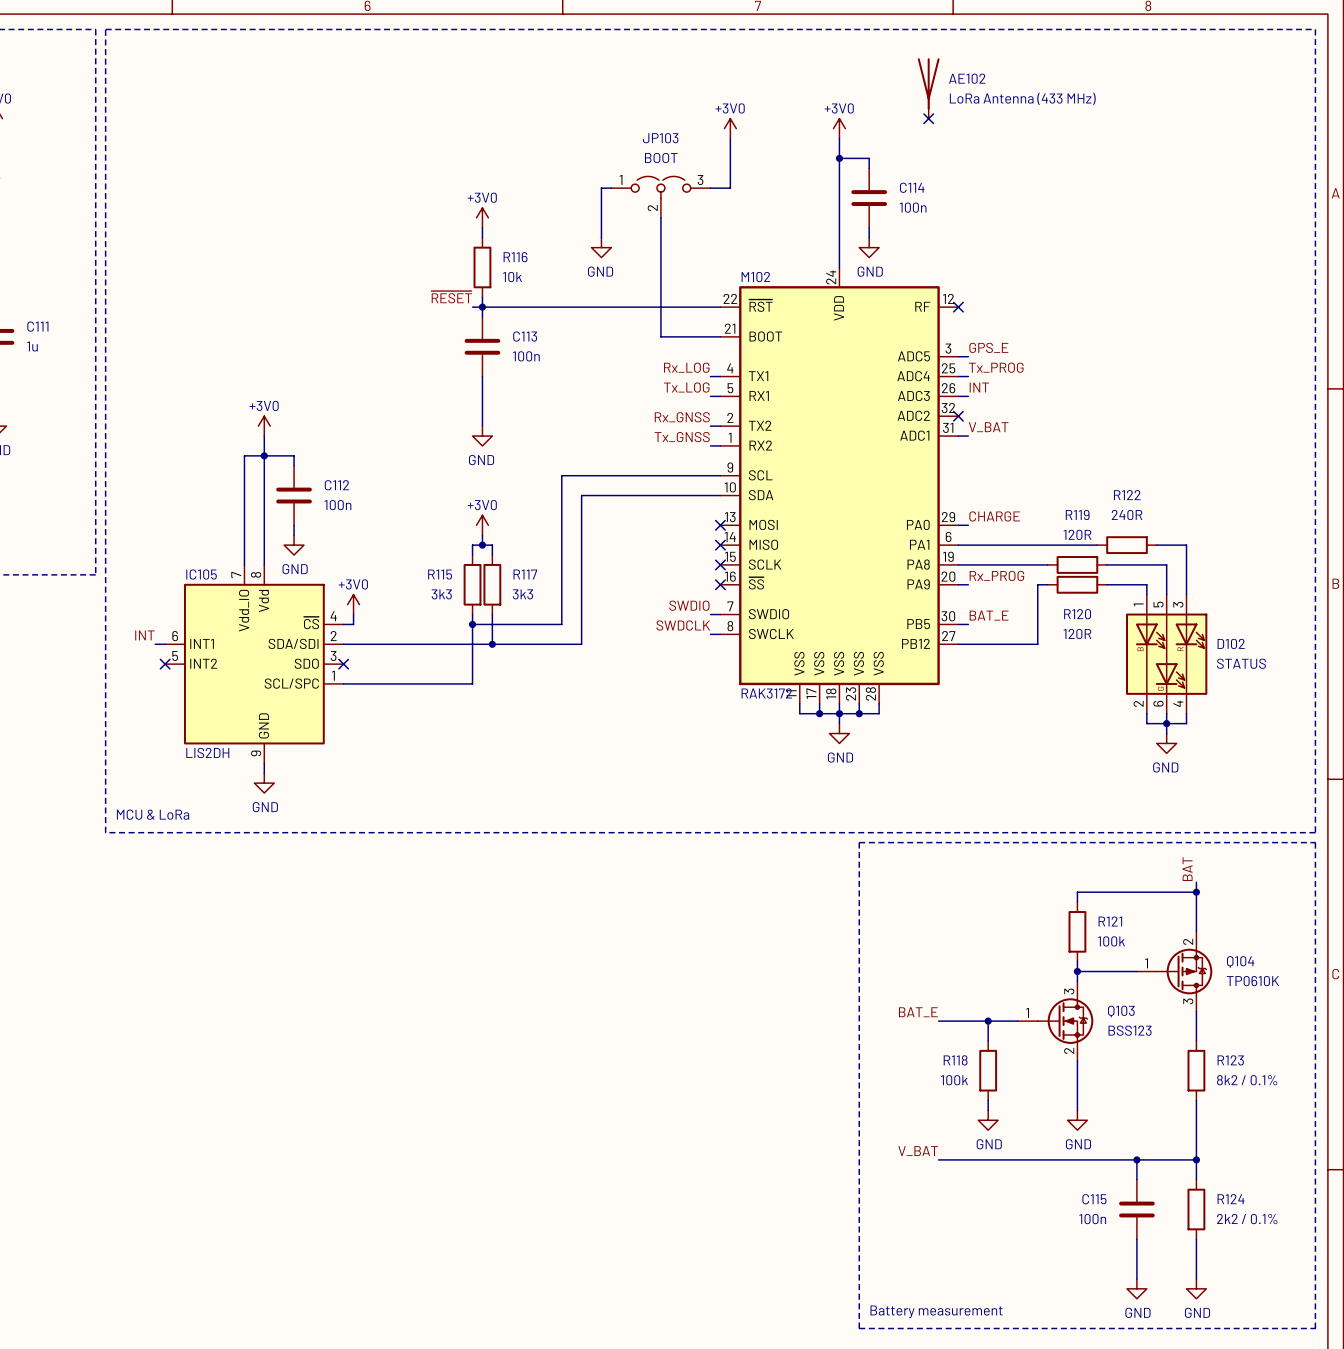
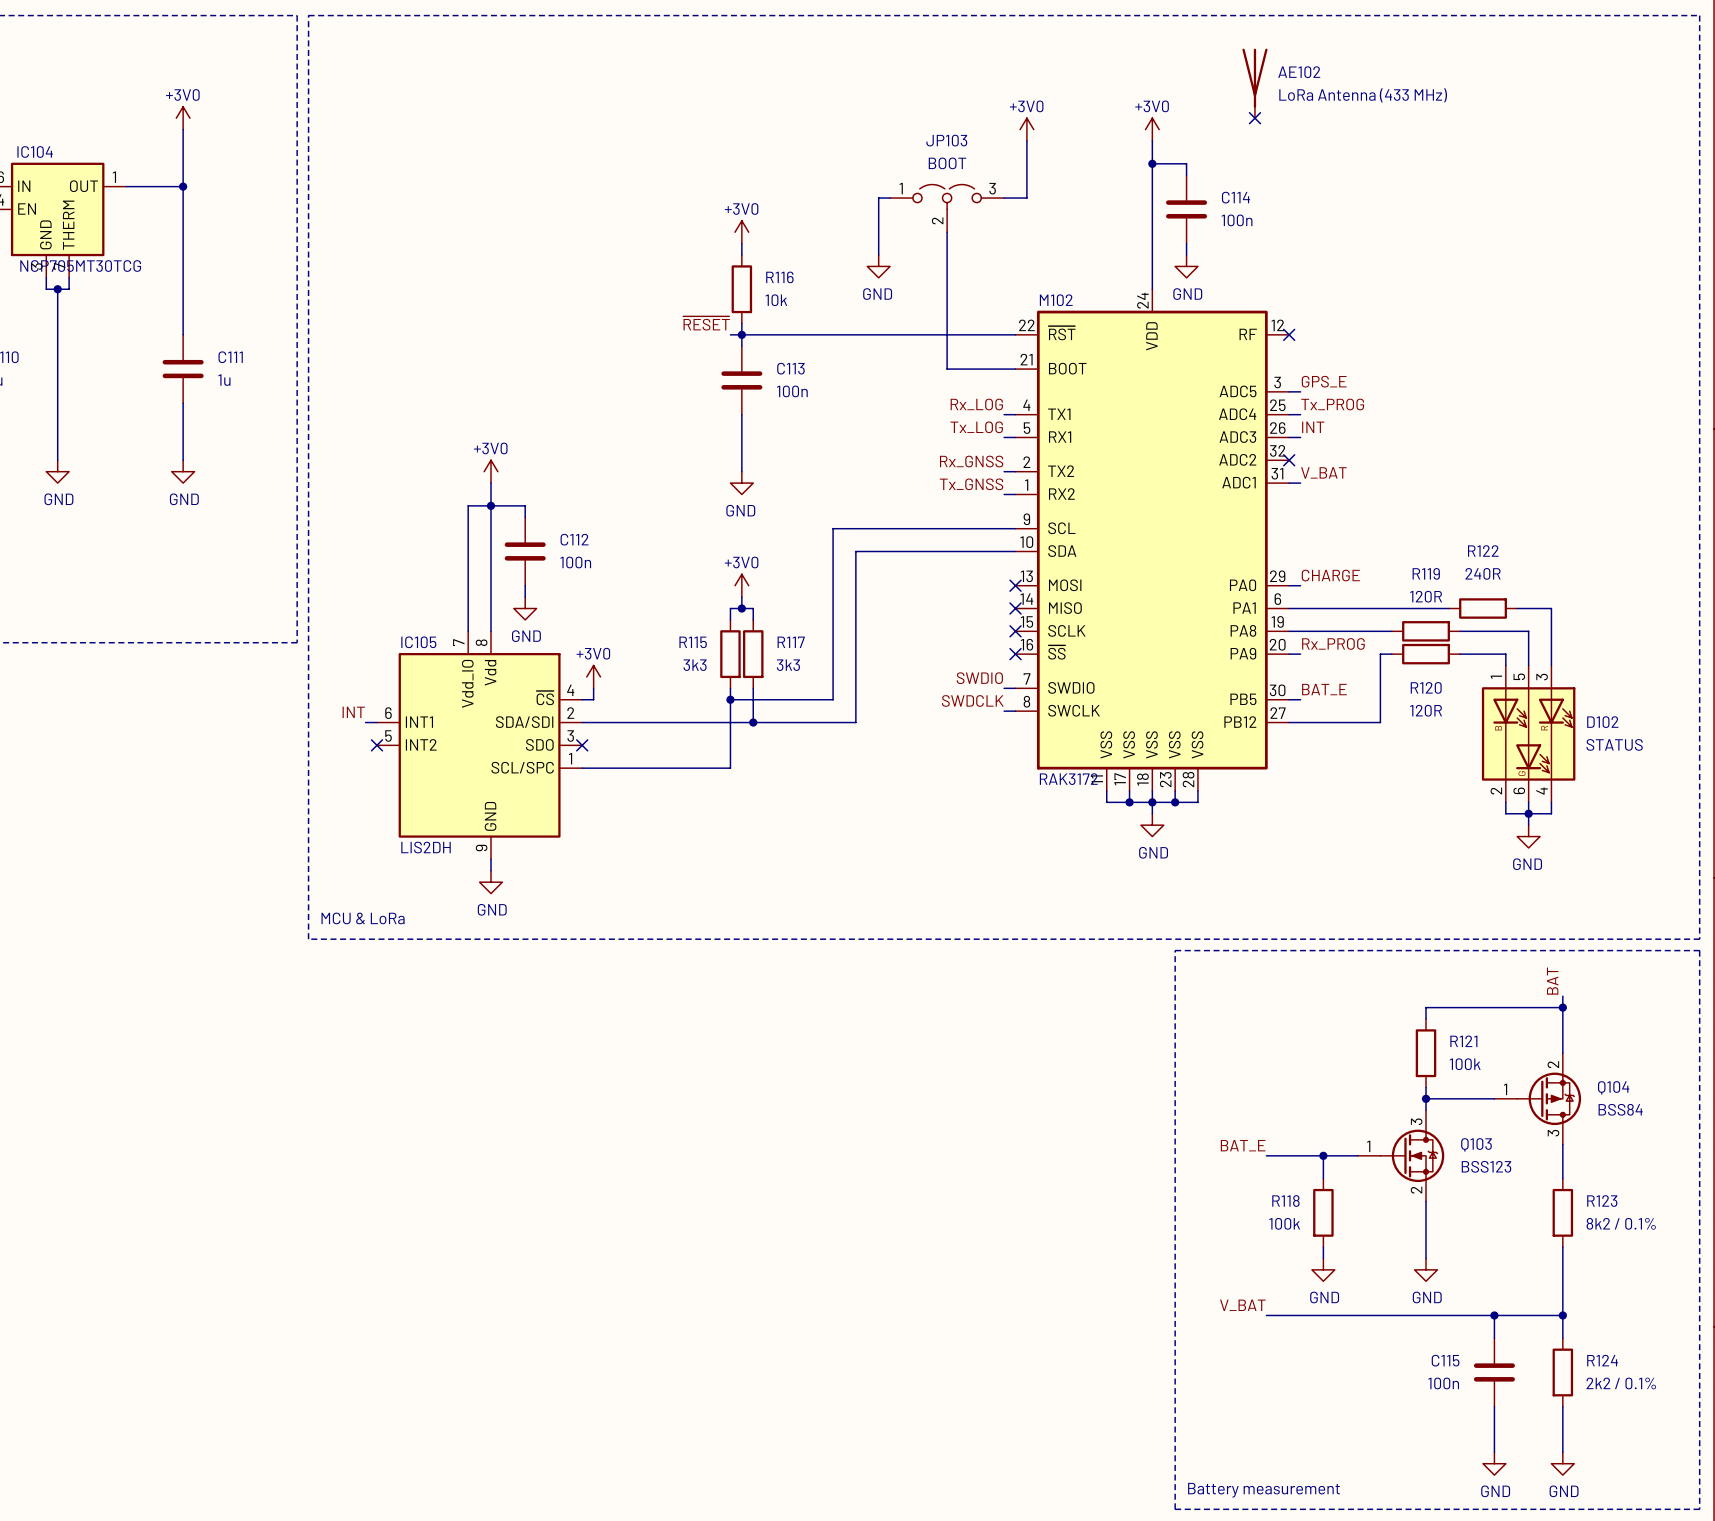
Q104 value: TP0610K (1252, 981) -> BSS84 (1620, 1109)

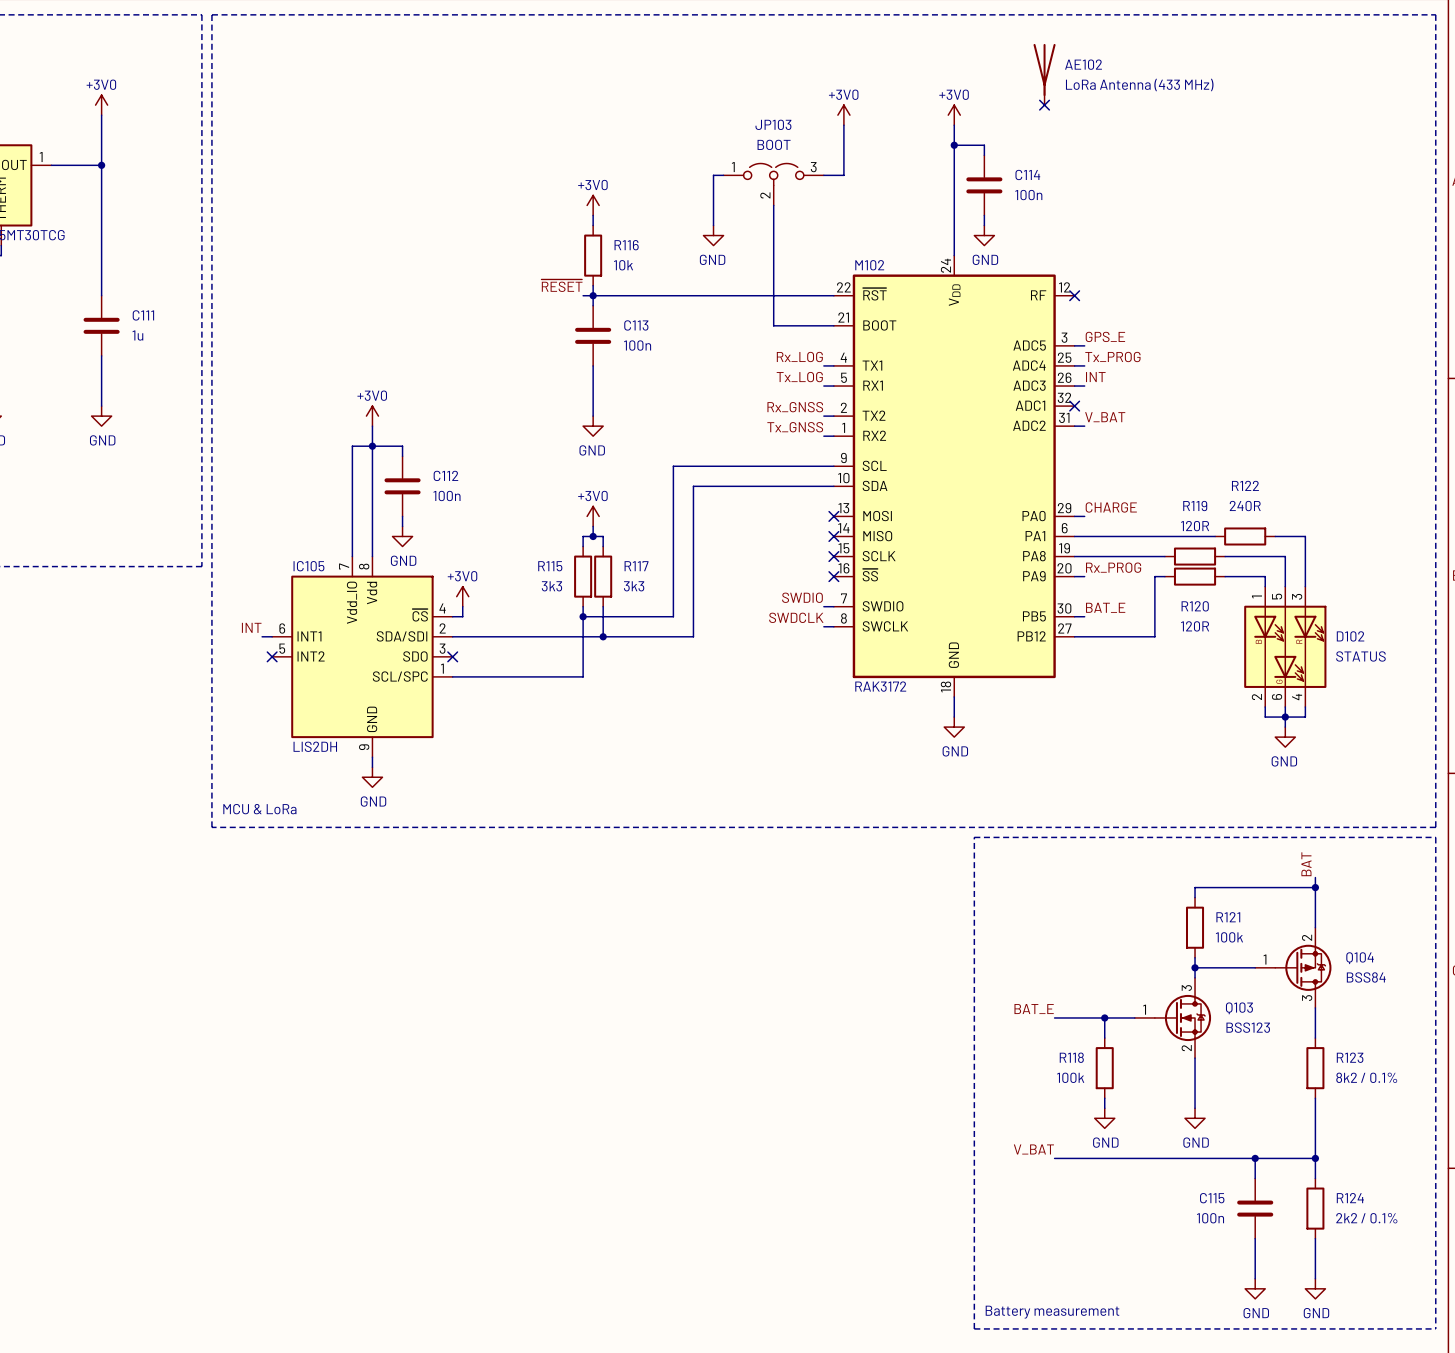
M102 symbol: [1015, 289, 1290, 791] -> [833, 255, 1075, 697]
wire: (1106, 790) (1106, 802) (1197, 802) (1197, 790) -> none
wire: (1129, 790) (1129, 802) -> none
wire: (1175, 790) (1175, 802) -> none
junction: (1129, 802) -> none
junction: (1152, 802) -> none
junction: (1175, 802) -> none

